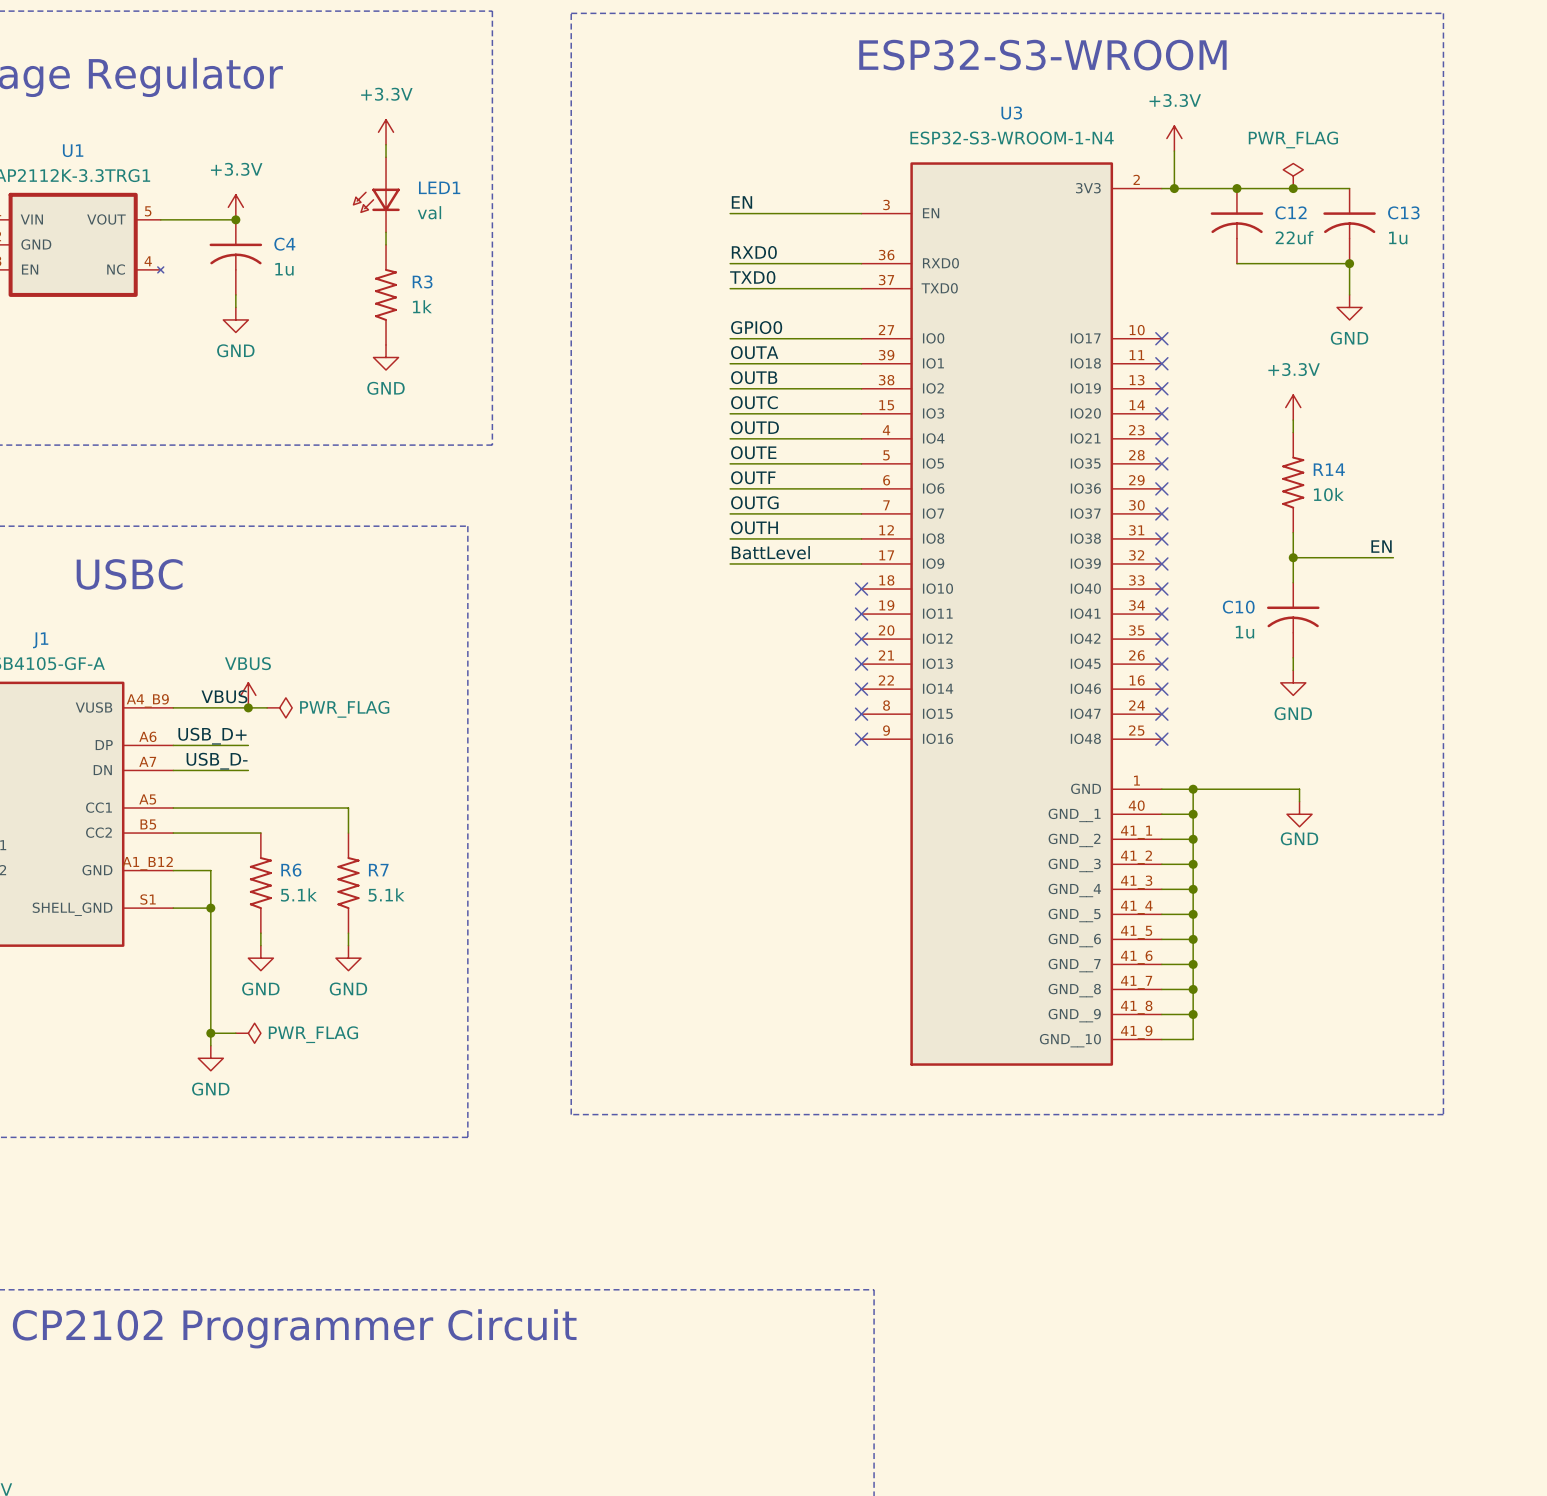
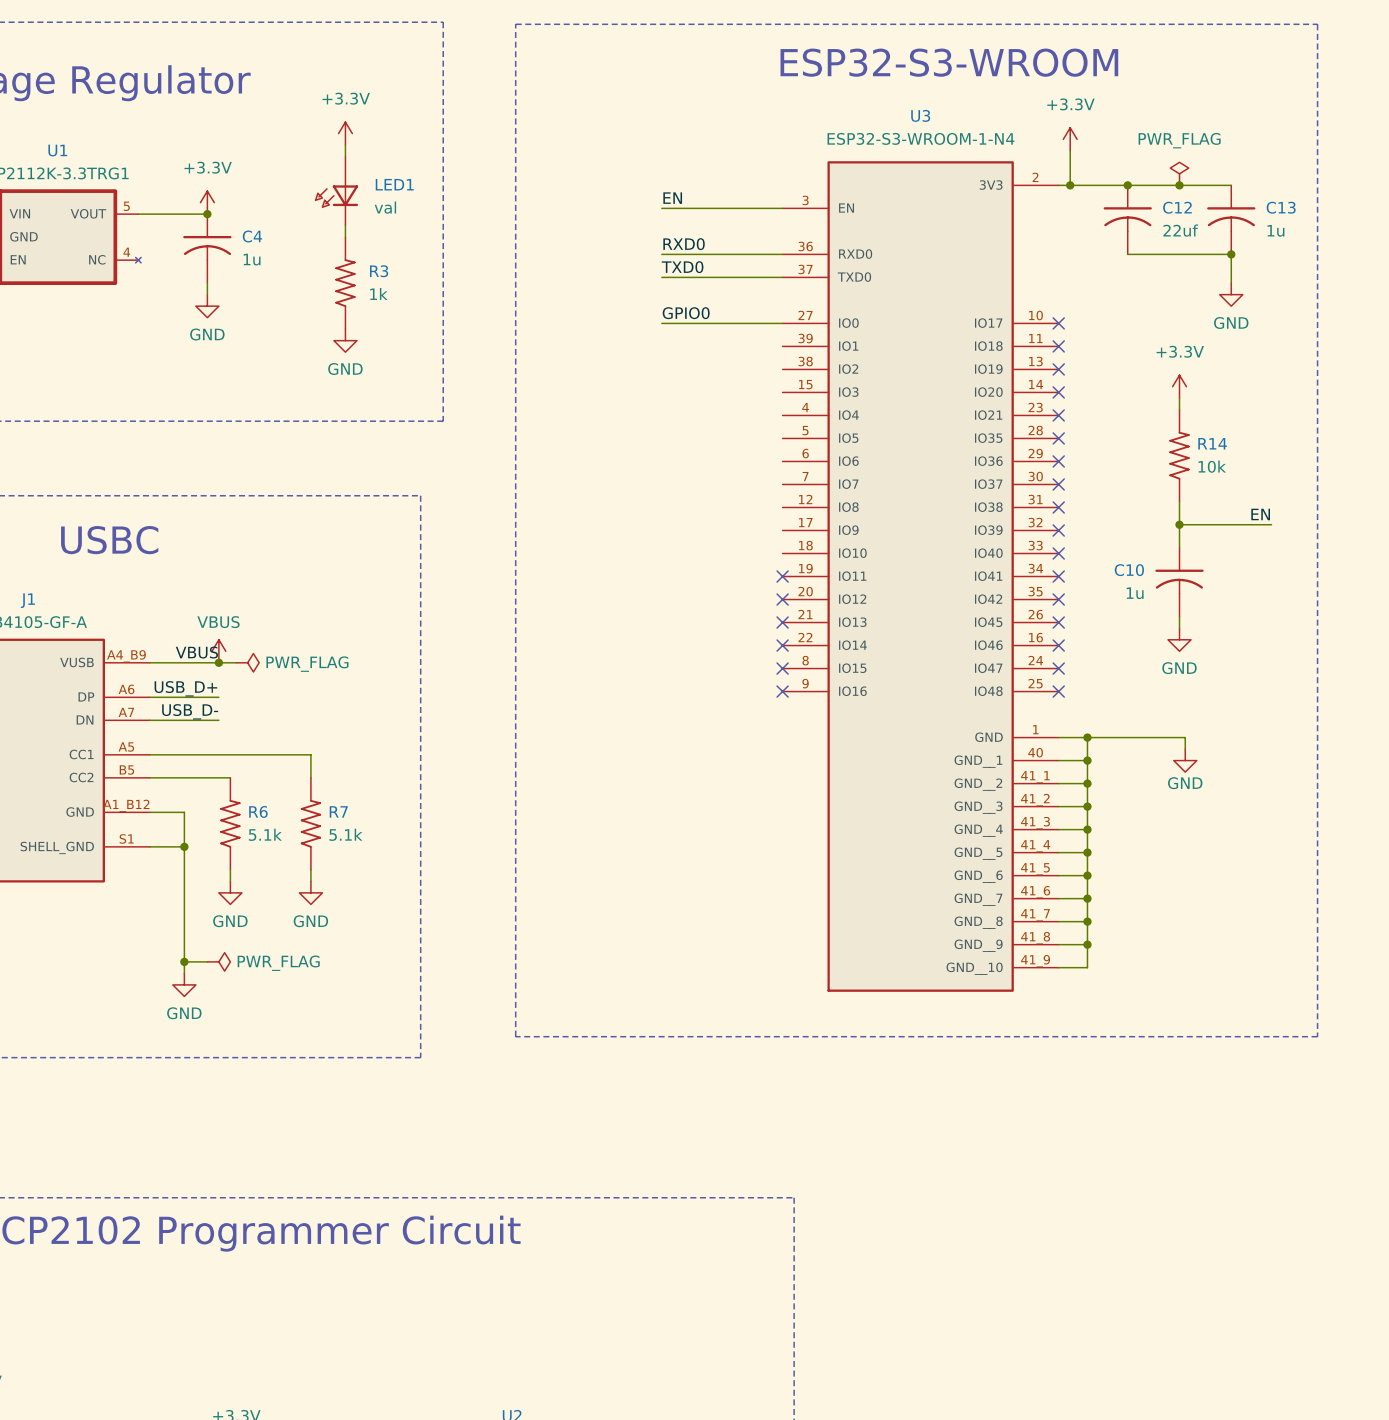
label: OUTA (754, 352) -> none
wire: (730, 363) (861, 363) -> none
label: OUTB (754, 377) -> none
wire: (730, 388) (861, 388) -> none
label: OUTC (754, 402) -> none
wire: (730, 413) (861, 413) -> none
label: OUTD (755, 427) -> none
wire: (730, 438) (861, 438) -> none
label: OUTE (753, 452) -> none
wire: (730, 463) (861, 463) -> none
label: OUTF (753, 477) -> none
wire: (730, 488) (861, 488) -> none
label: OUTG (754, 502) -> none
wire: (730, 513) (861, 513) -> none
label: OUTH (754, 527) -> none
wire: (730, 538) (861, 538) -> none
label: BattLevel (770, 552) -> none
wire: (730, 563) (861, 563) -> none
no-connect mark: (861, 589) -> none

